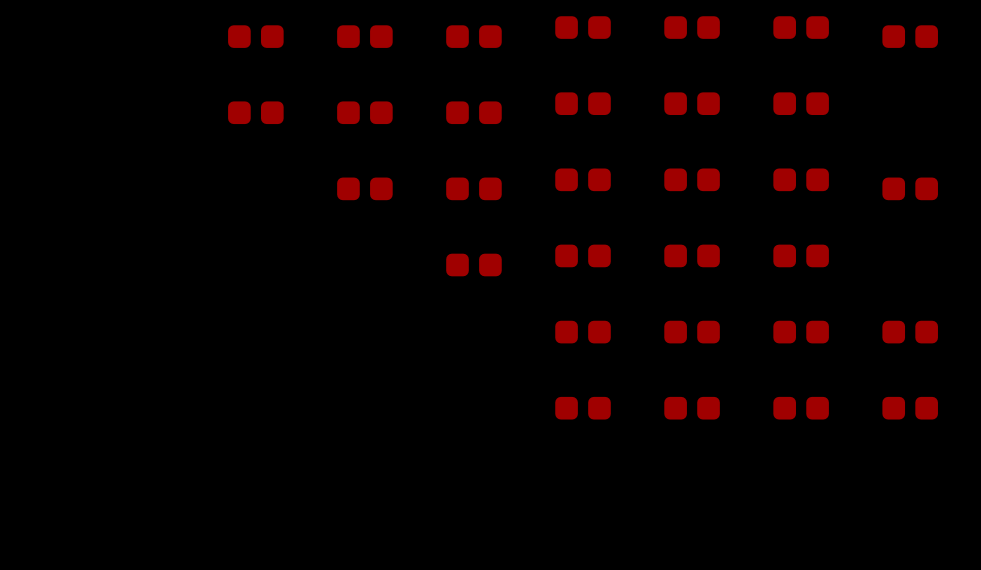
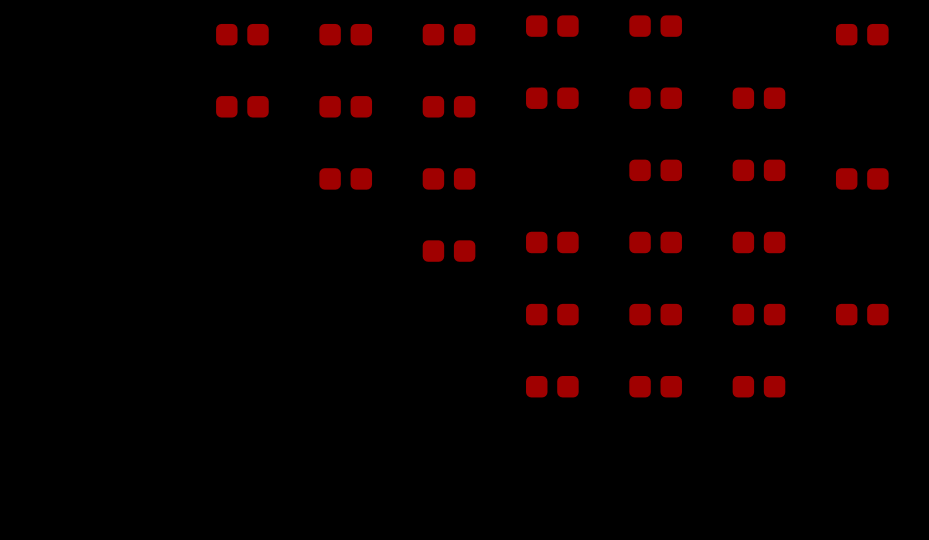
part: (801, 27) -> none
part: (583, 179) -> none
part: (910, 408) -> none

